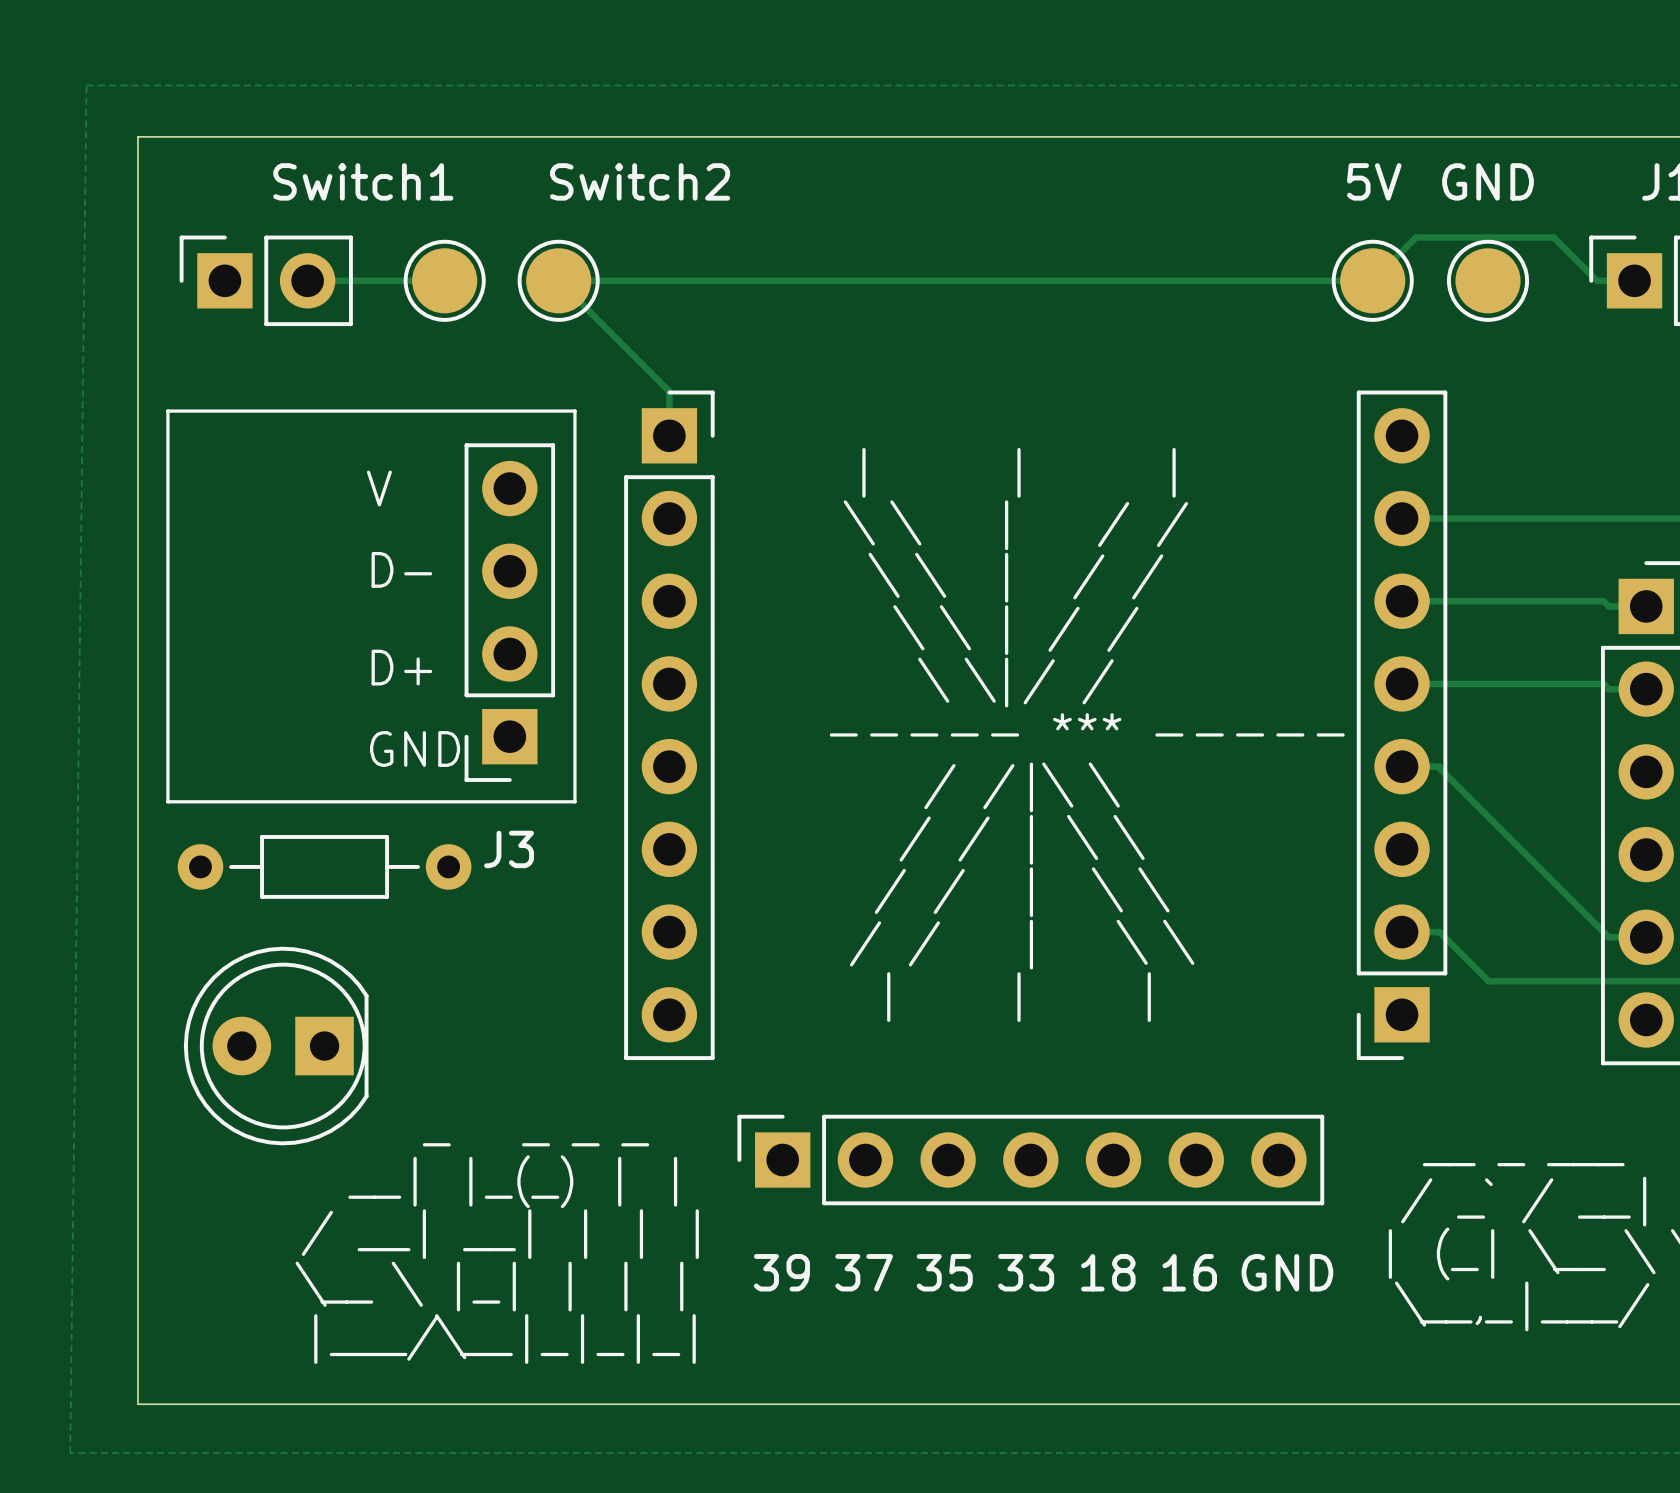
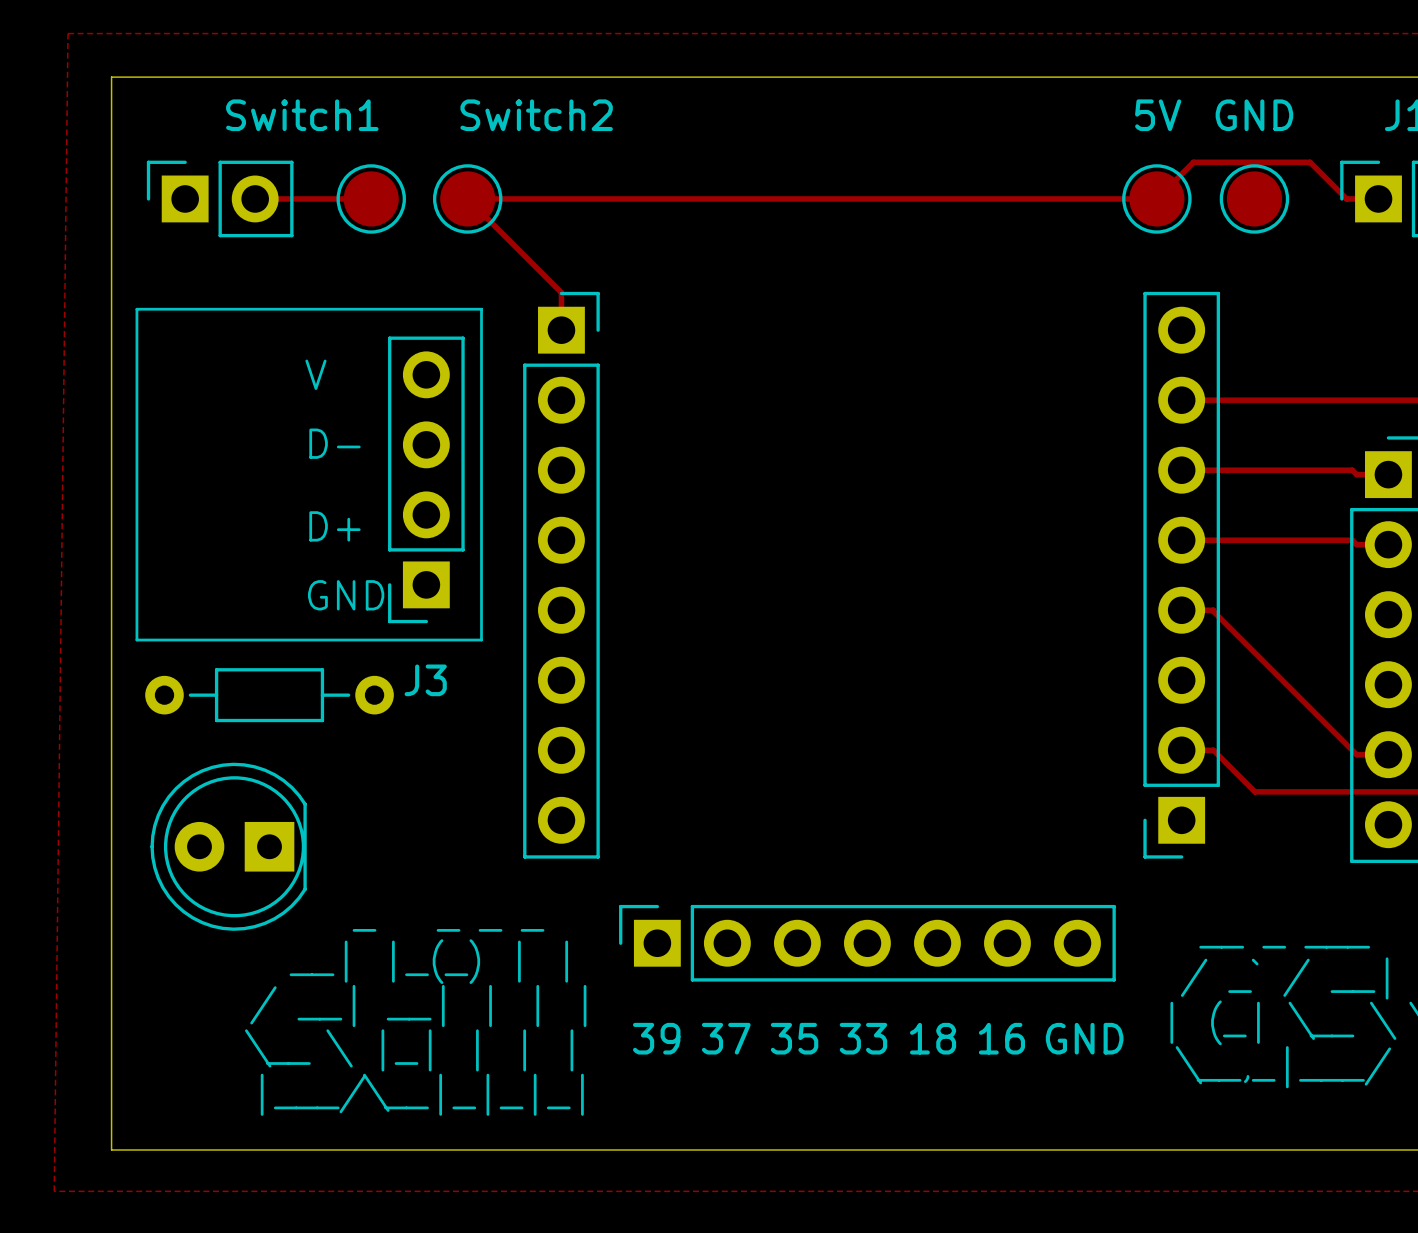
text: | | | (1019, 472) -> none
text: \ \ | / / (1015, 525) -> none
text: \ \ | / / (1015, 577) -> none
text: \ \ | / / (1015, 630) -> none
text: \ \|/ / (1015, 682) -> none
text: ----- *** ----- (1087, 724) -> none
text: / /|\ \ (1022, 787) -> none
text: / / | \ \ (1022, 839) -> none
text: / / | \ \ (1022, 892) -> none
text: / / | \ \ (1022, 944) -> none
text: | | | (1019, 997) -> none

